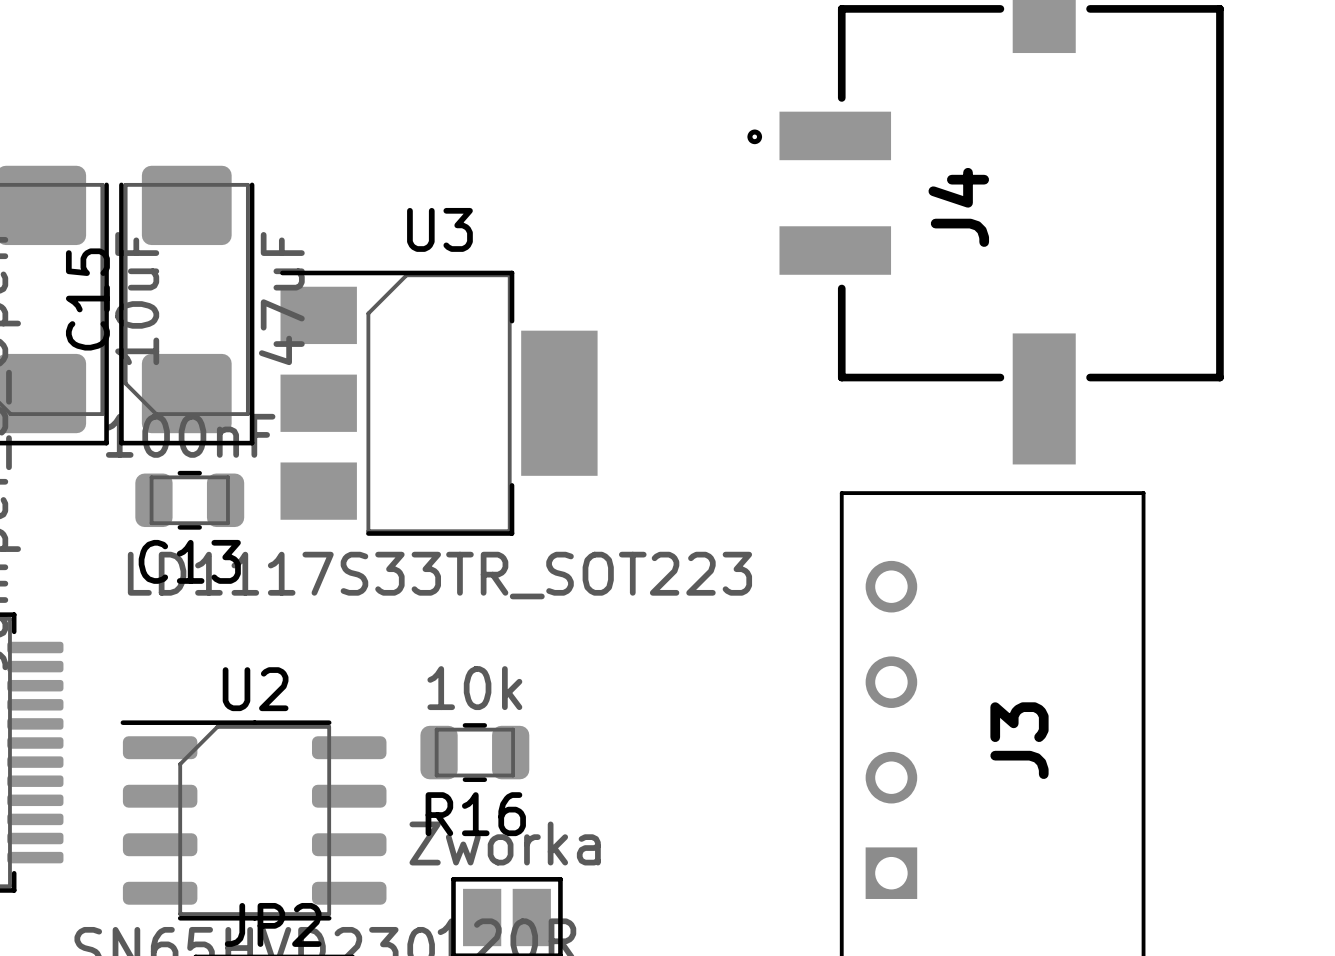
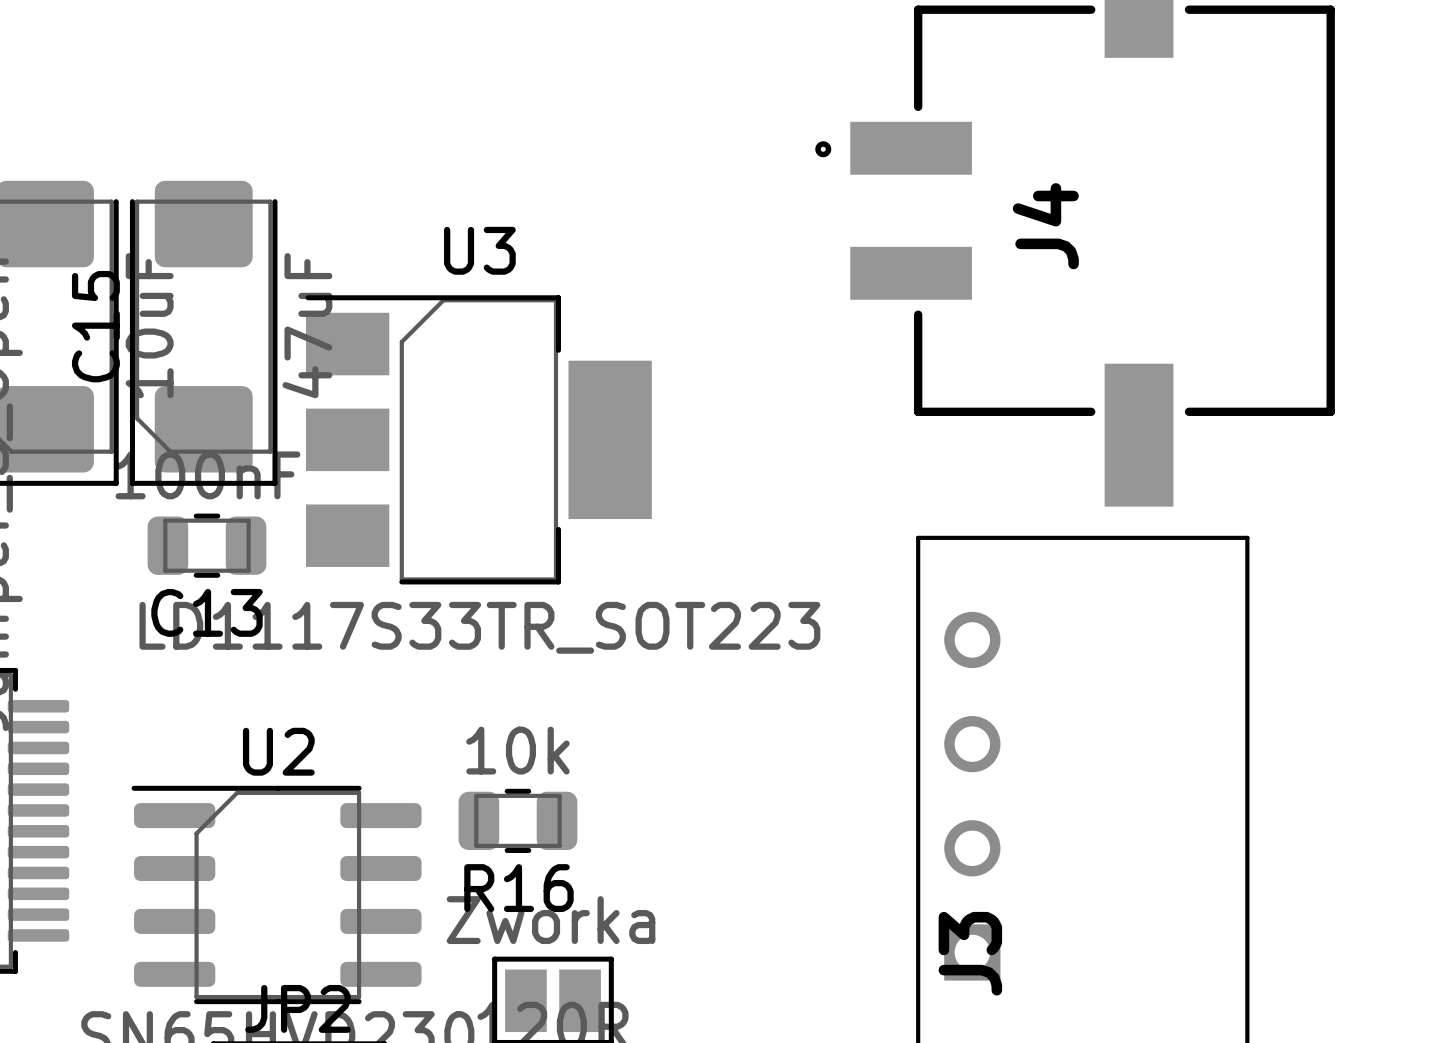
J3 name position: J3 (1019, 740) -> J3 (970, 953)

